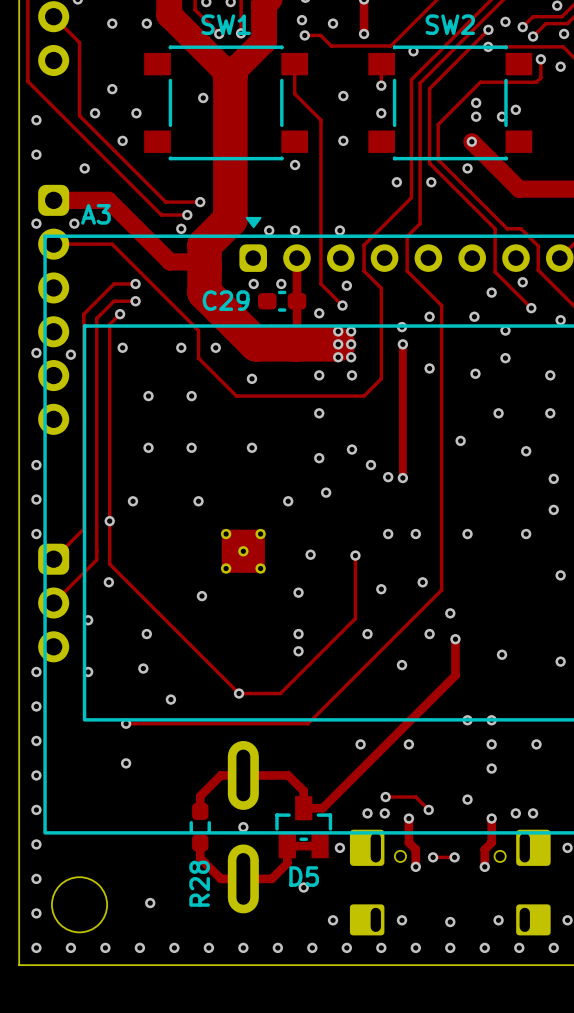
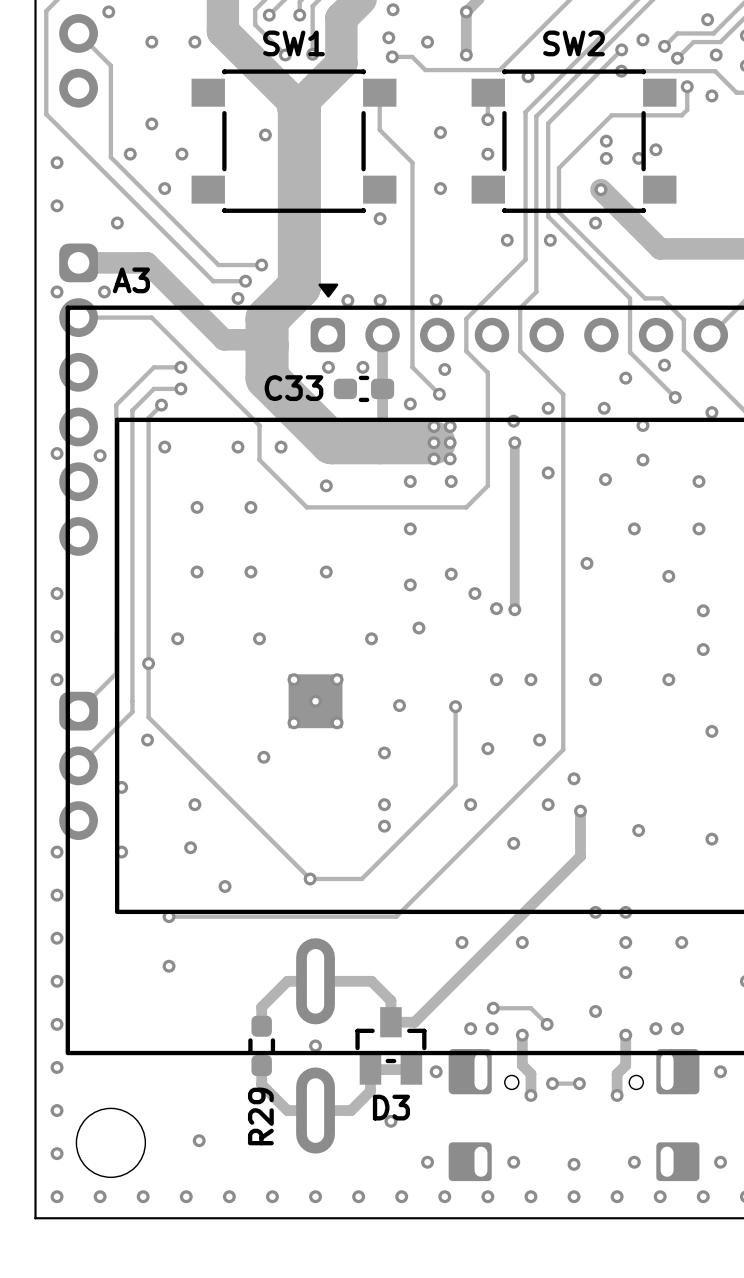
C29 name: C29 (226, 300) -> C33 (293, 388)
D5 name: D5 (304, 876) -> D3 (391, 1107)
R28 name: R28 (199, 883) -> R29 (260, 1116)

